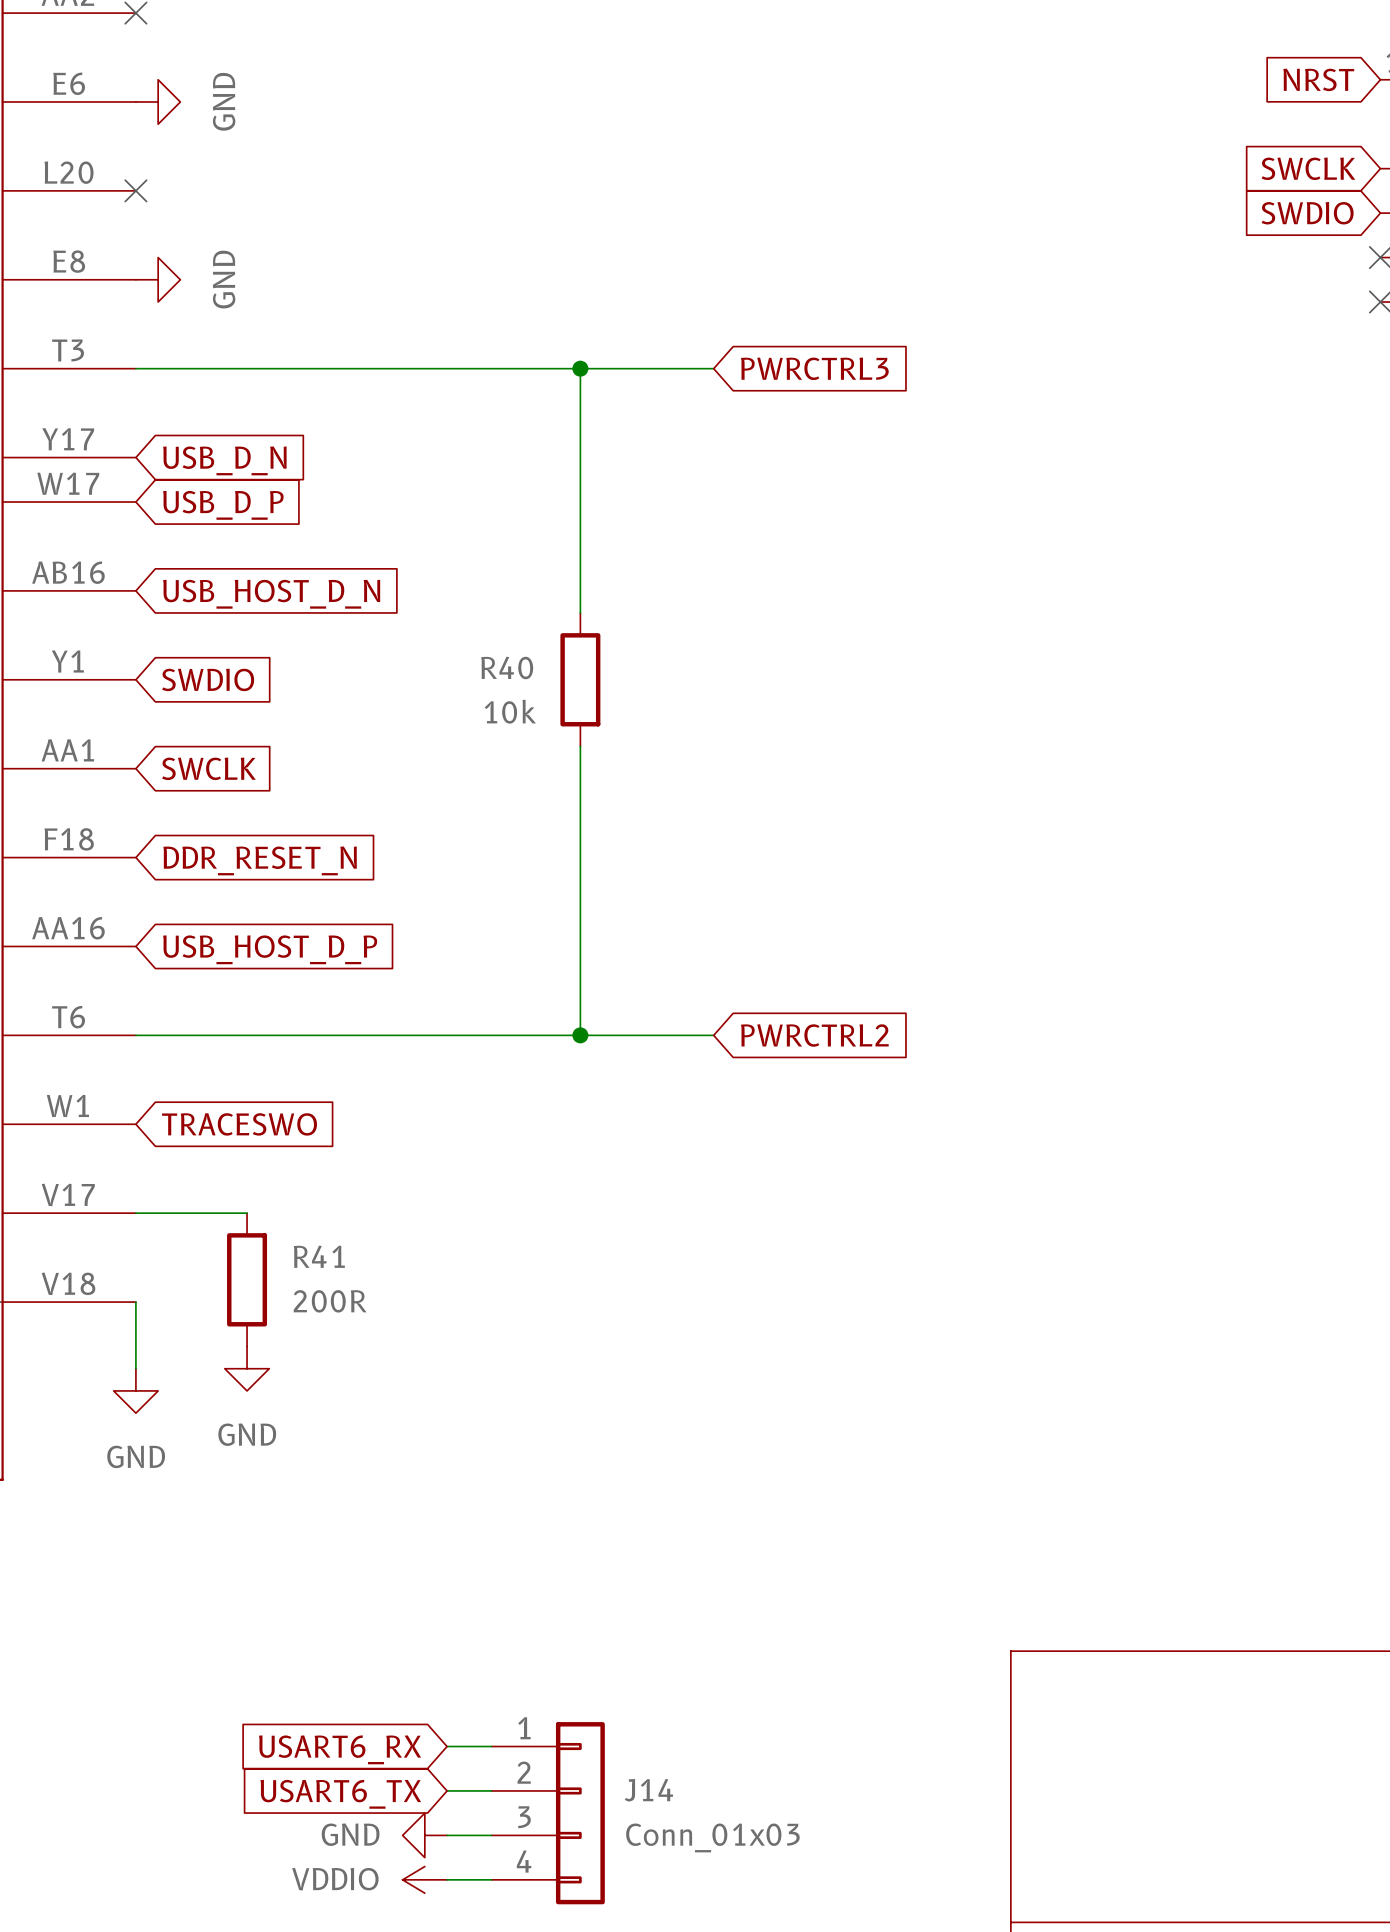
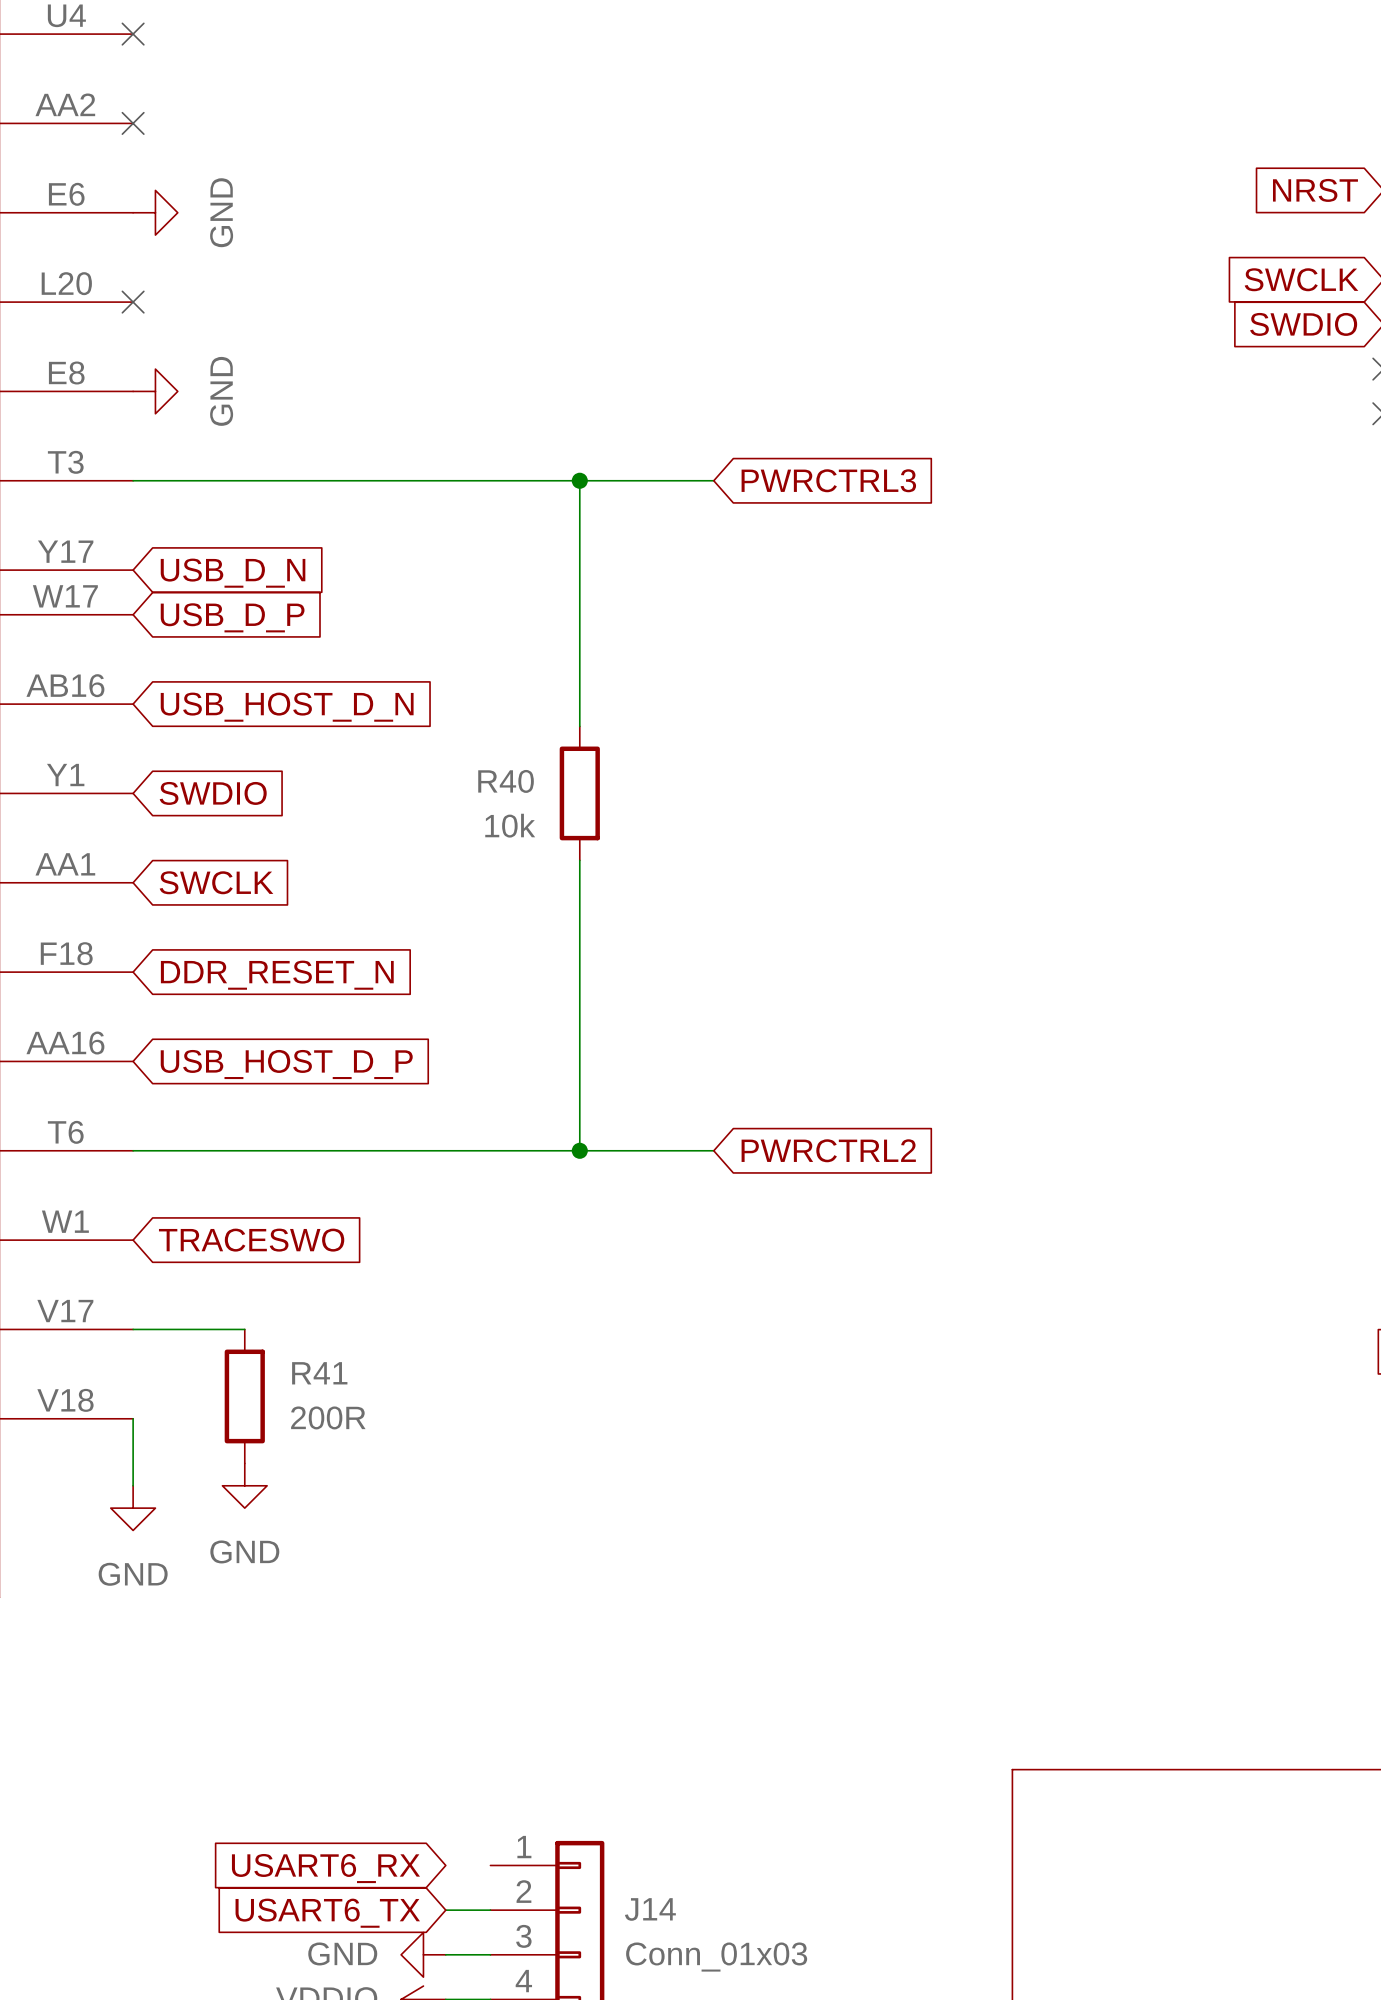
wire: (447, 1746) (491, 1746) -> none

